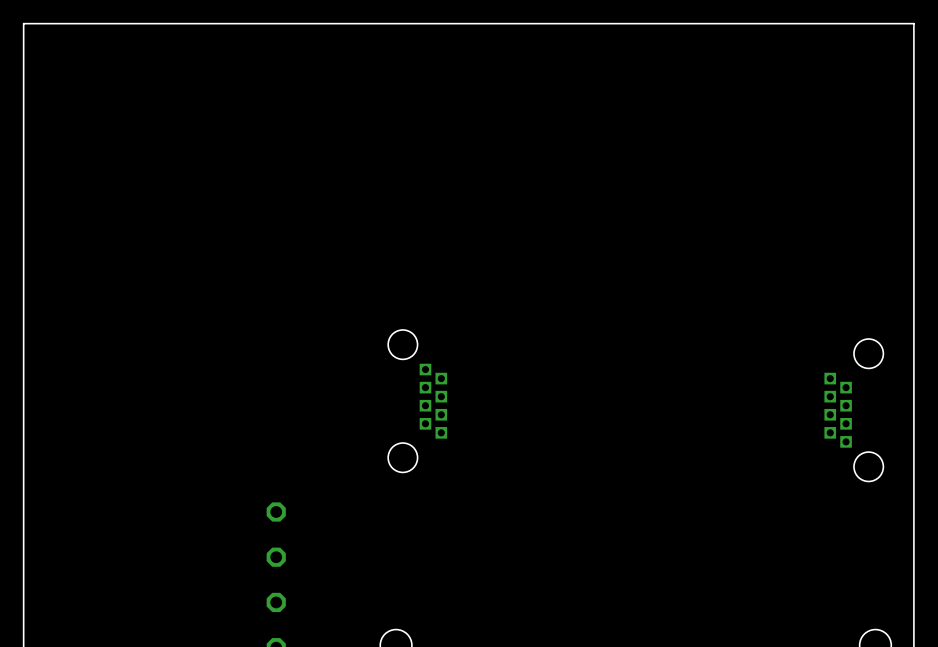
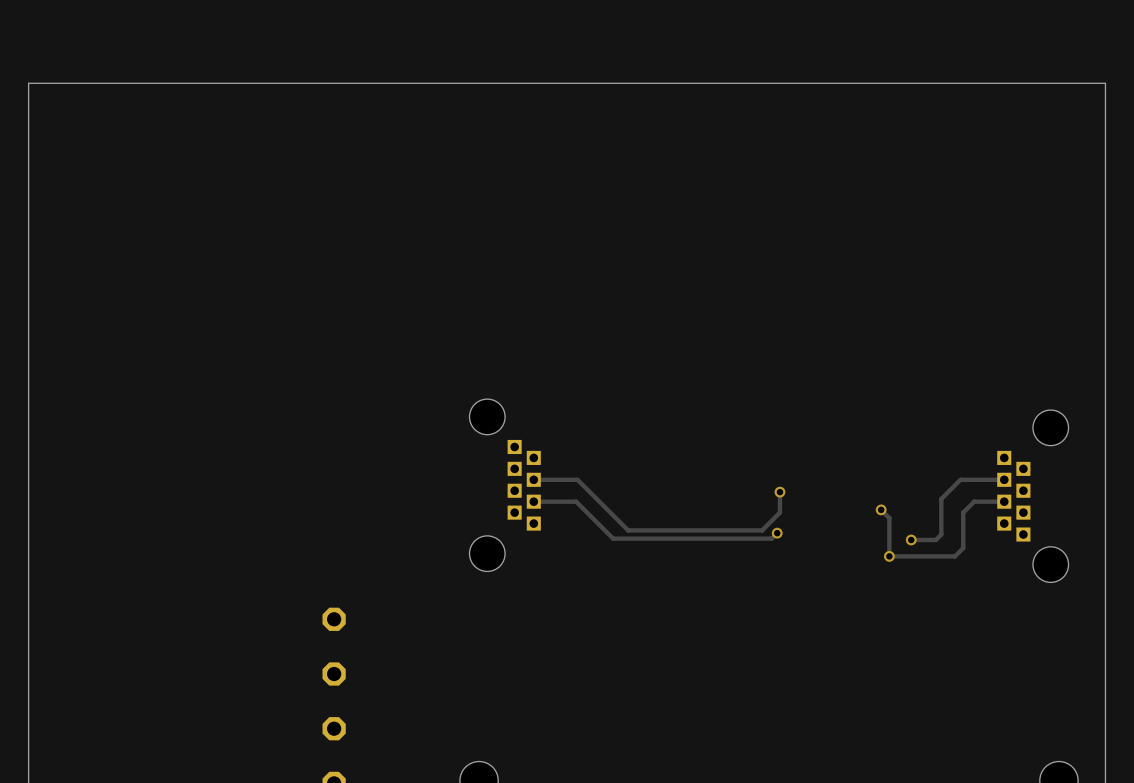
board edge: (913, 68) (913, 23) (23, 23) (23, 68) -> (1105, 83) (28, 83)
track: none -> (533, 479) (577, 479) (628, 530) (762, 530) (779, 512) (779, 492)
track: none -> (1004, 479) (960, 479) (941, 498) (941, 534) (935, 539) (911, 539)
via: none -> (779, 492)
track: none -> (533, 501) (576, 501) (613, 538) (771, 538) (777, 533)
track: none -> (1004, 501) (974, 501) (963, 512) (963, 548) (955, 556) (889, 556)
track: none -> (881, 509) (889, 518) (889, 550)
via: none -> (881, 509)
via: none -> (777, 533)
via: none -> (911, 539)
via: none -> (889, 556)

